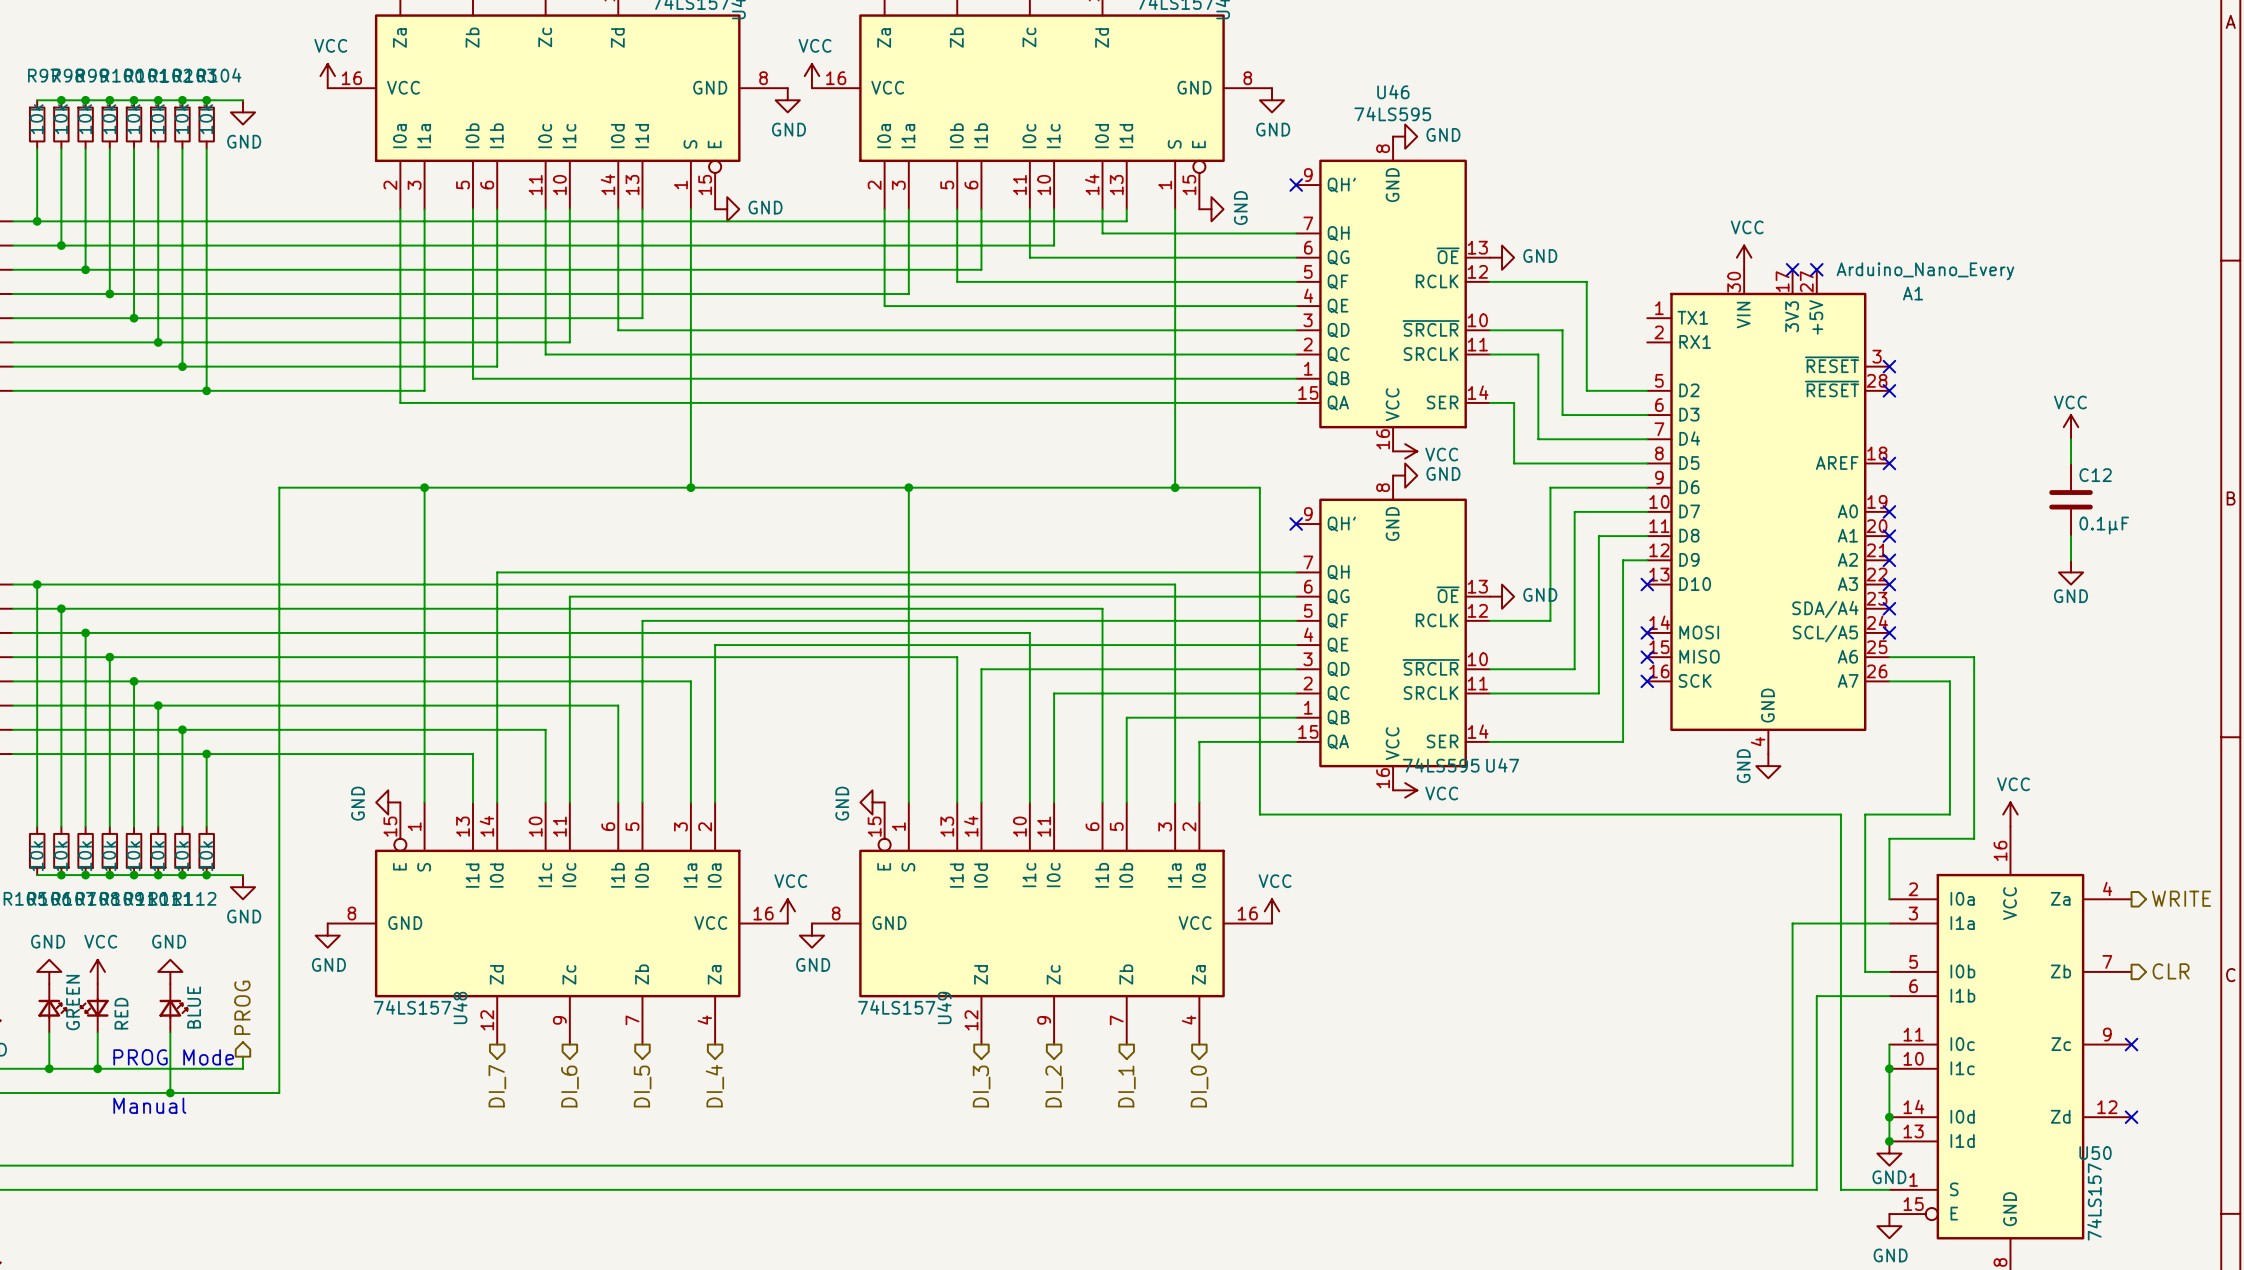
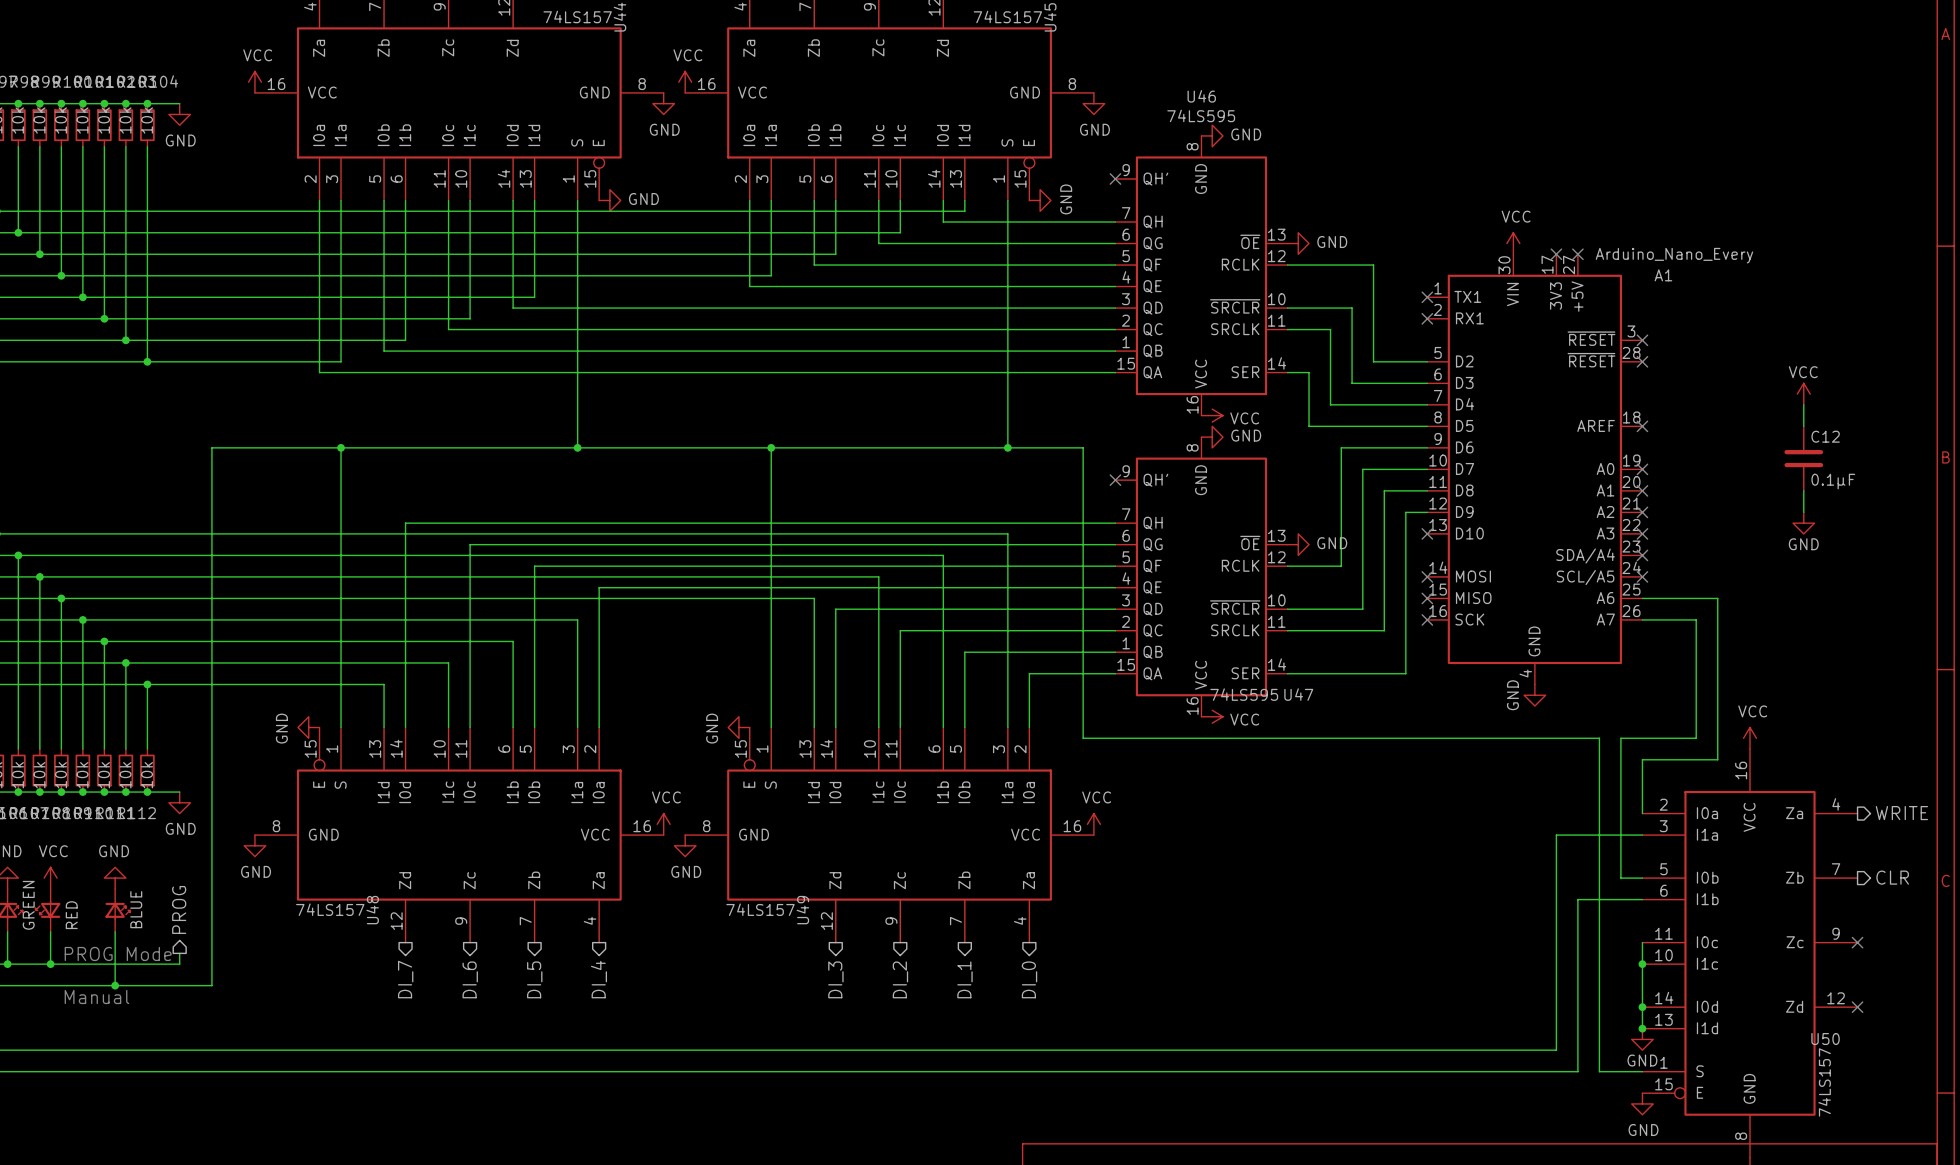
no-connect mark: none -> (1427, 297)
no-connect mark: none -> (1427, 318)

